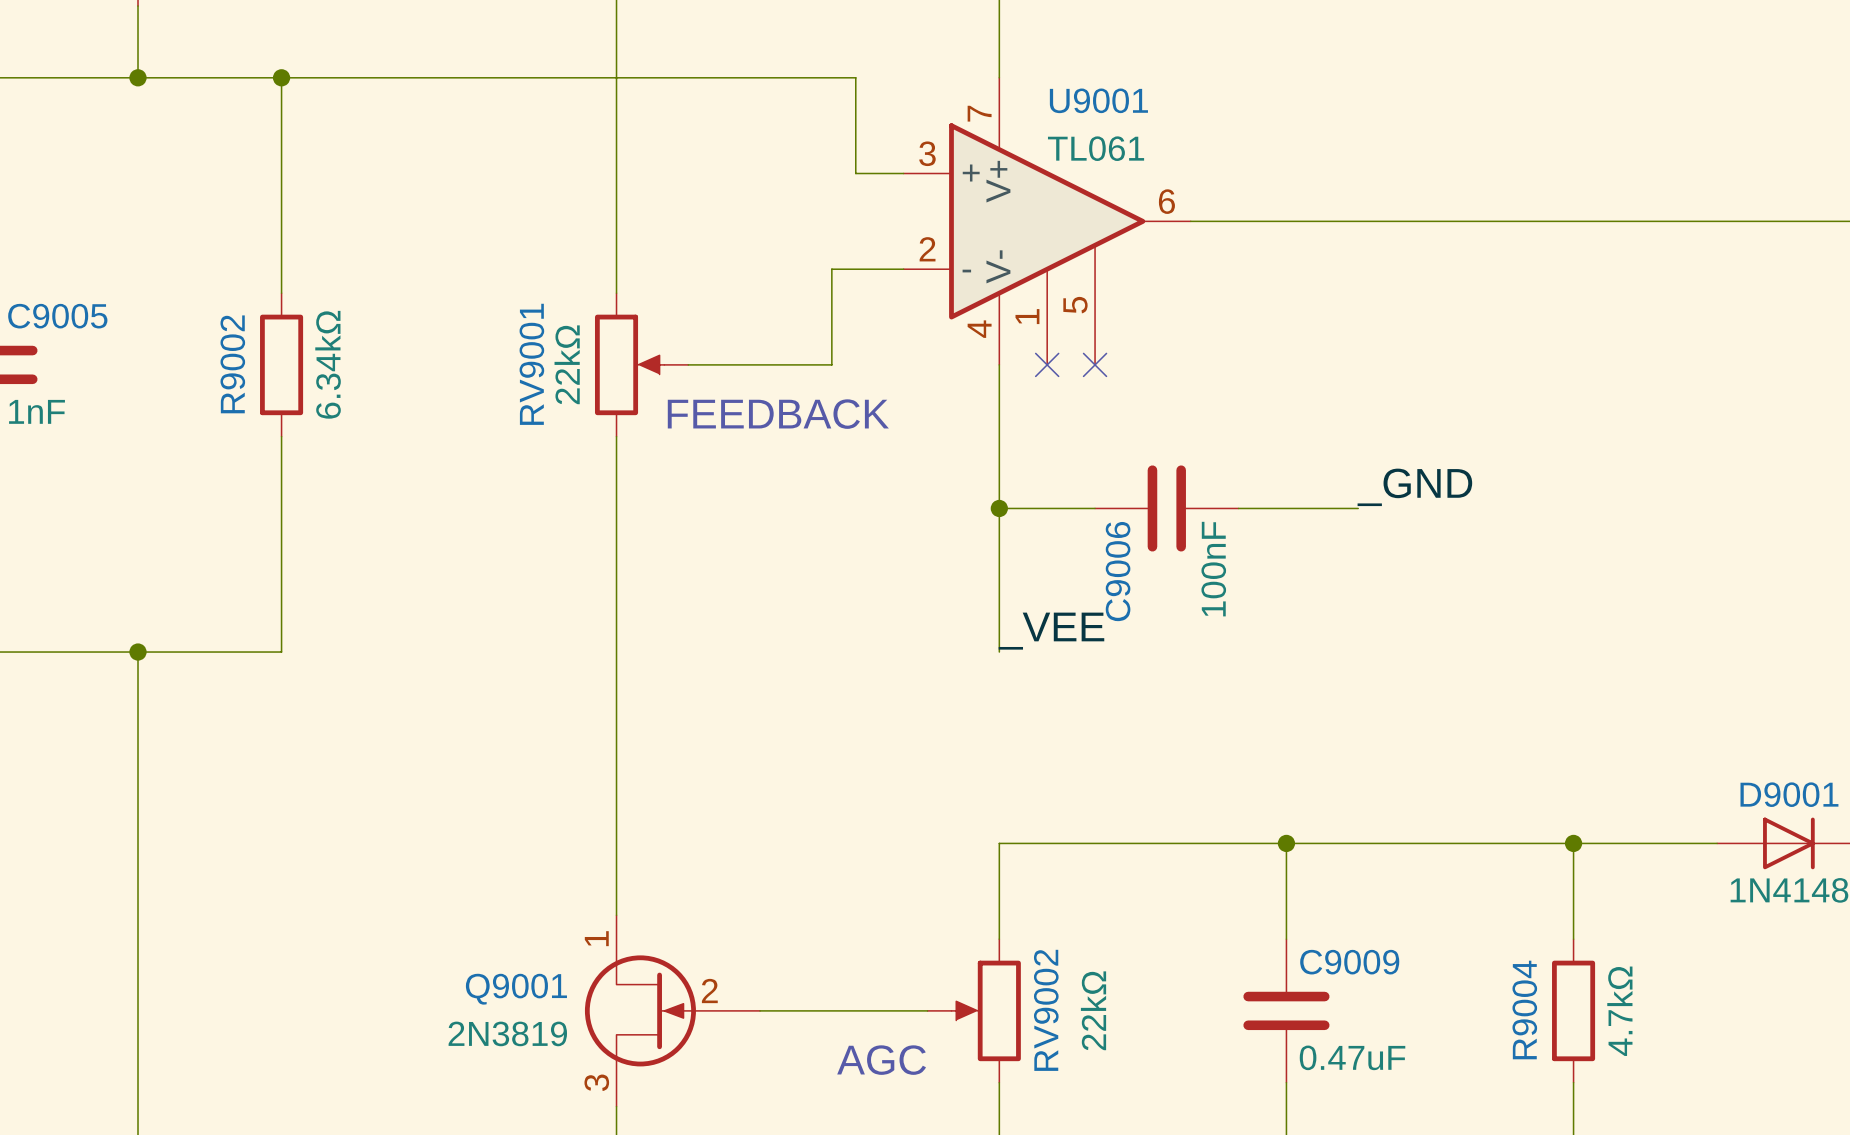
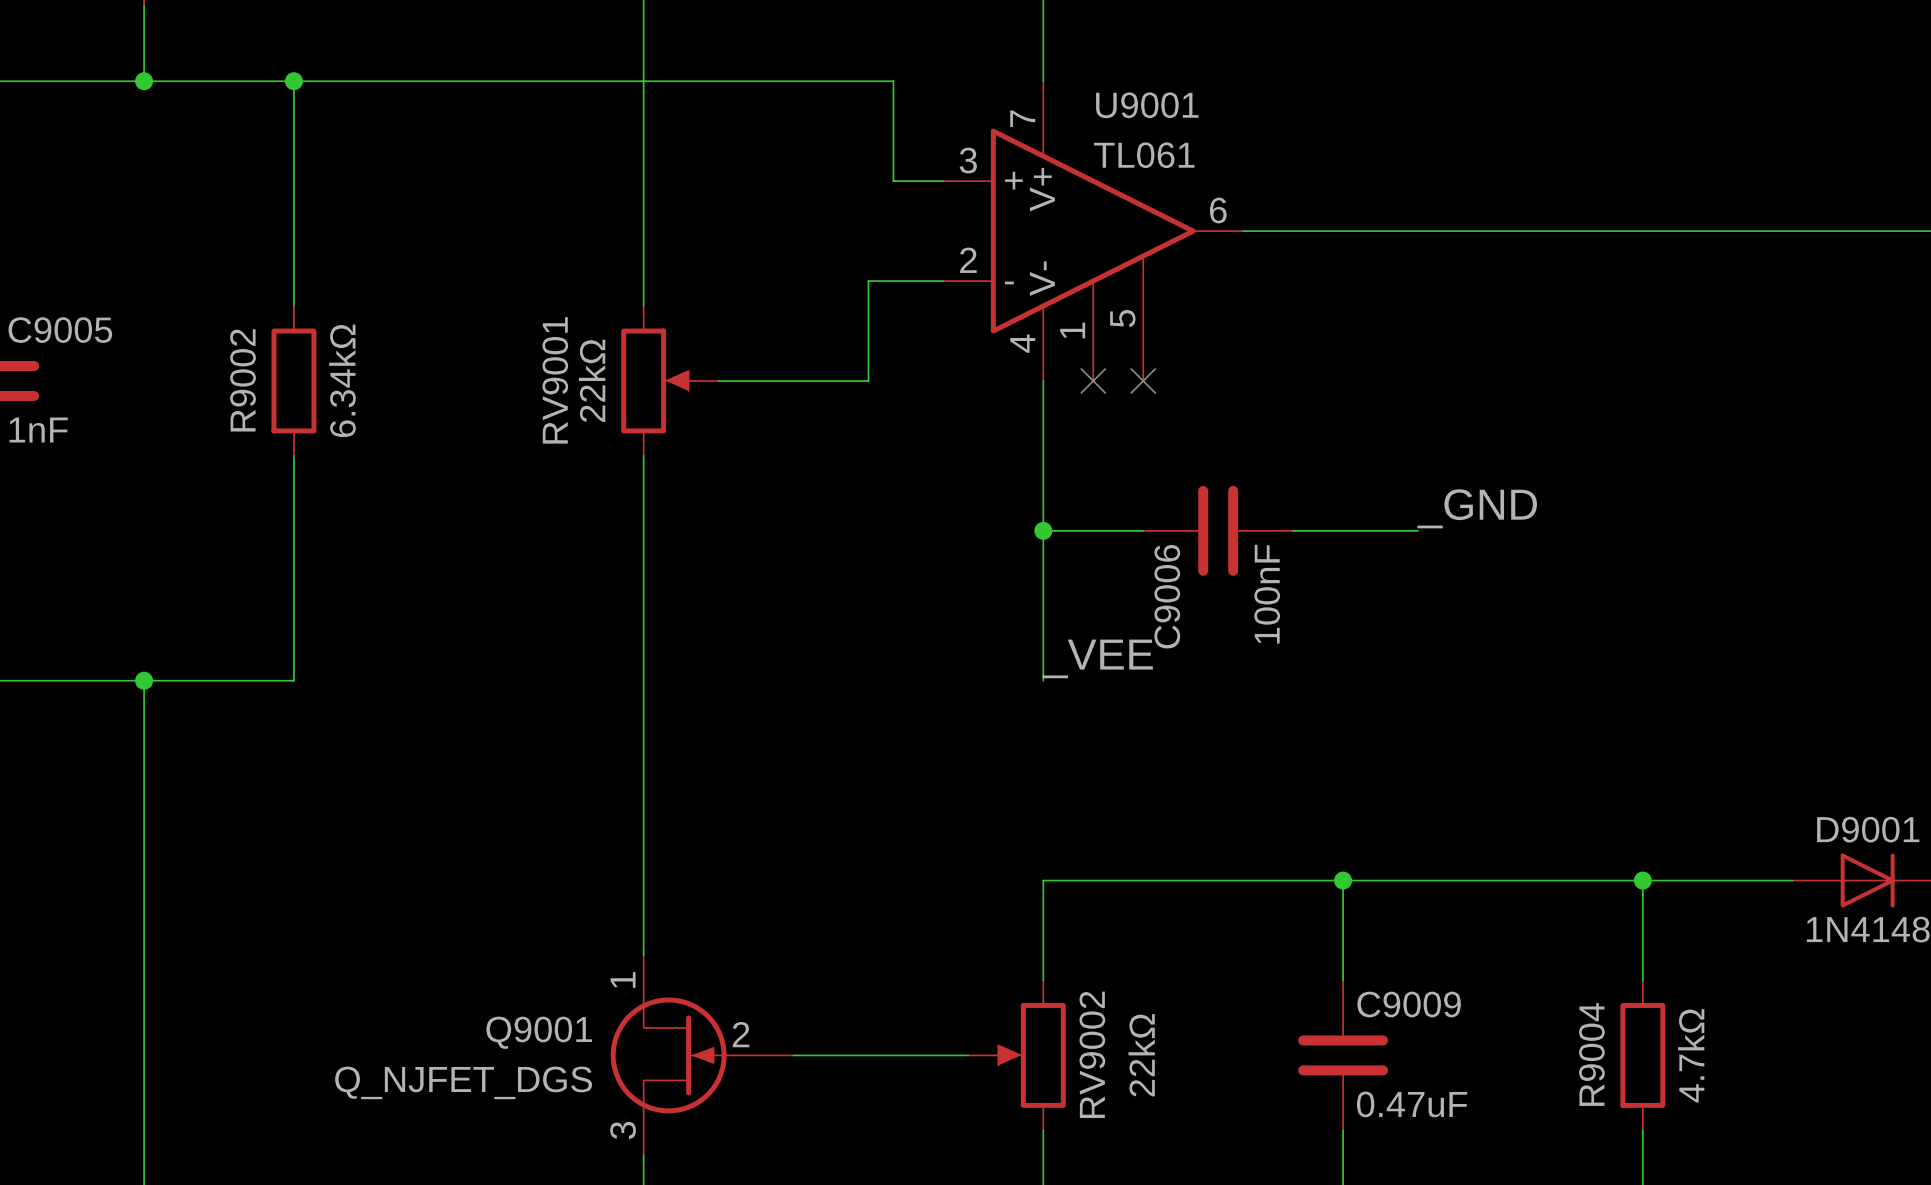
text: FEEDBACK (778, 414) -> none
Q9001 value: 2N3819 (507, 1033) -> Q_NJFET_DGS (463, 1082)
text: AGC (881, 1060) -> none

